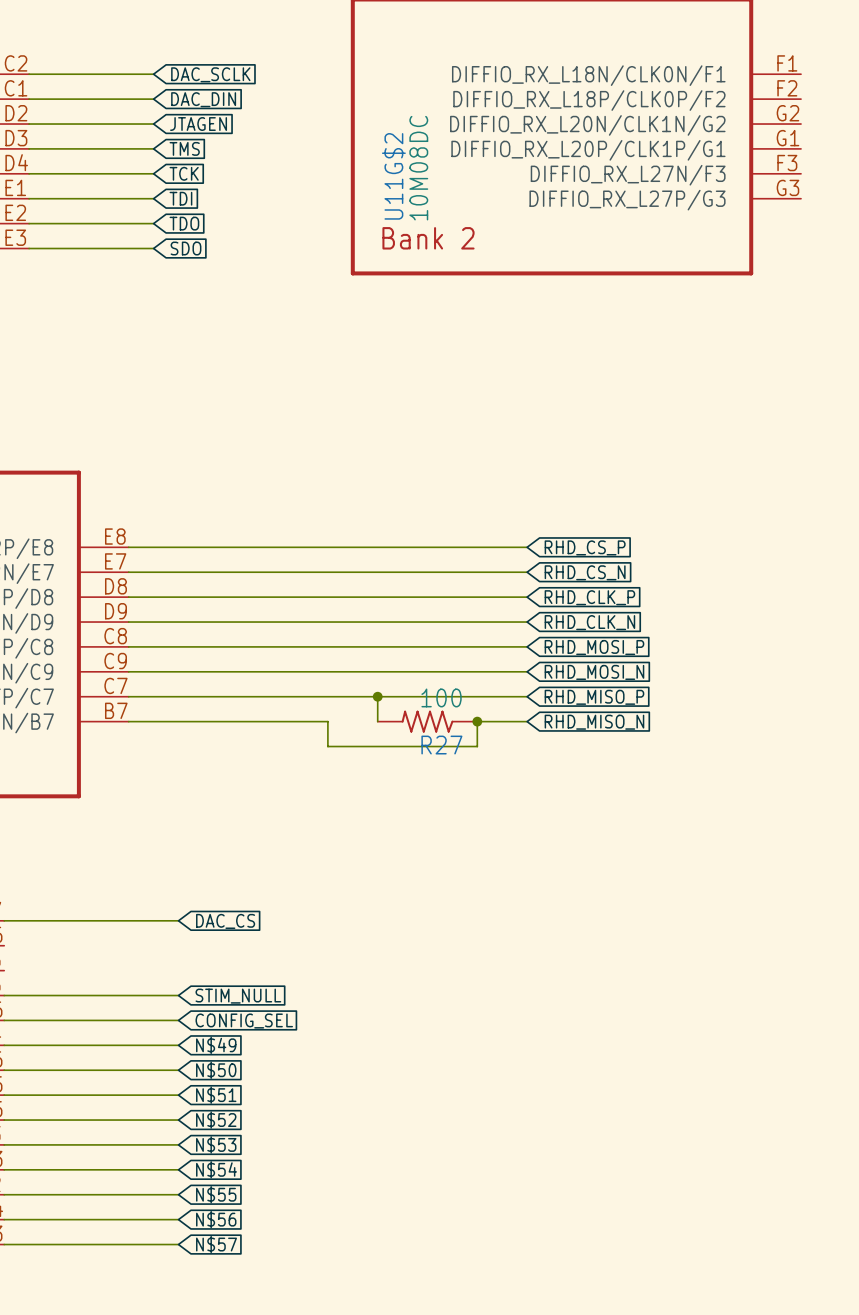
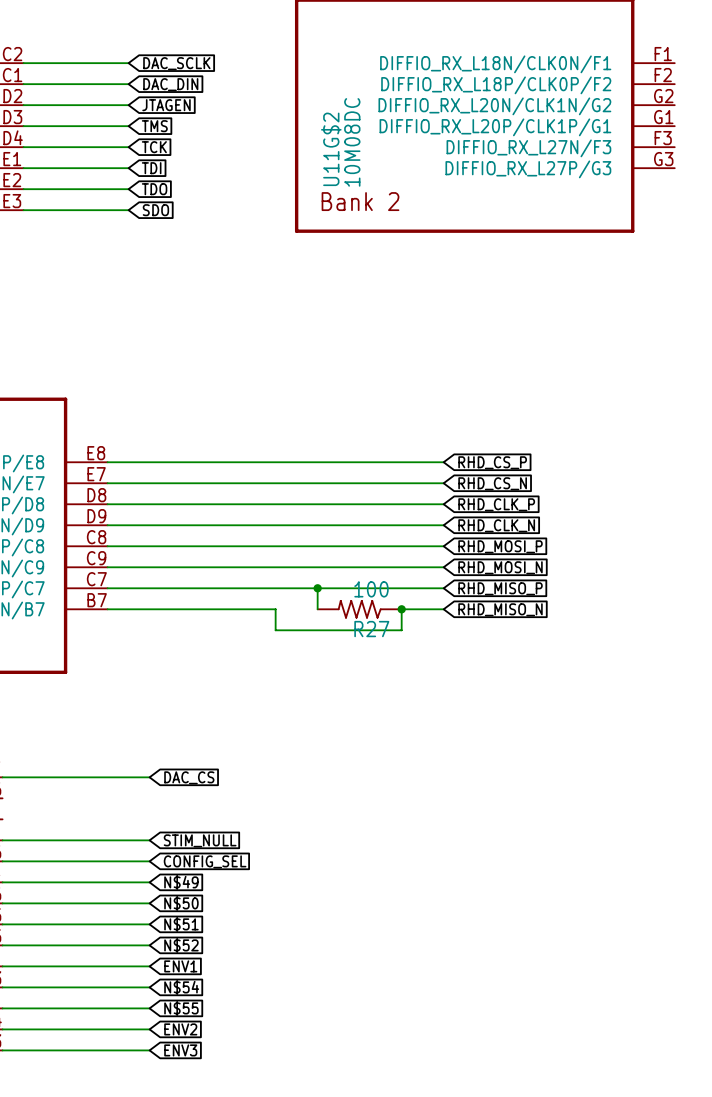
global label: N$53 (216, 1144) -> ENV1 (180, 966)
global label: N$56 (216, 1219) -> ENV2 (180, 1029)
global label: N$57 (216, 1244) -> ENV3 (180, 1050)

